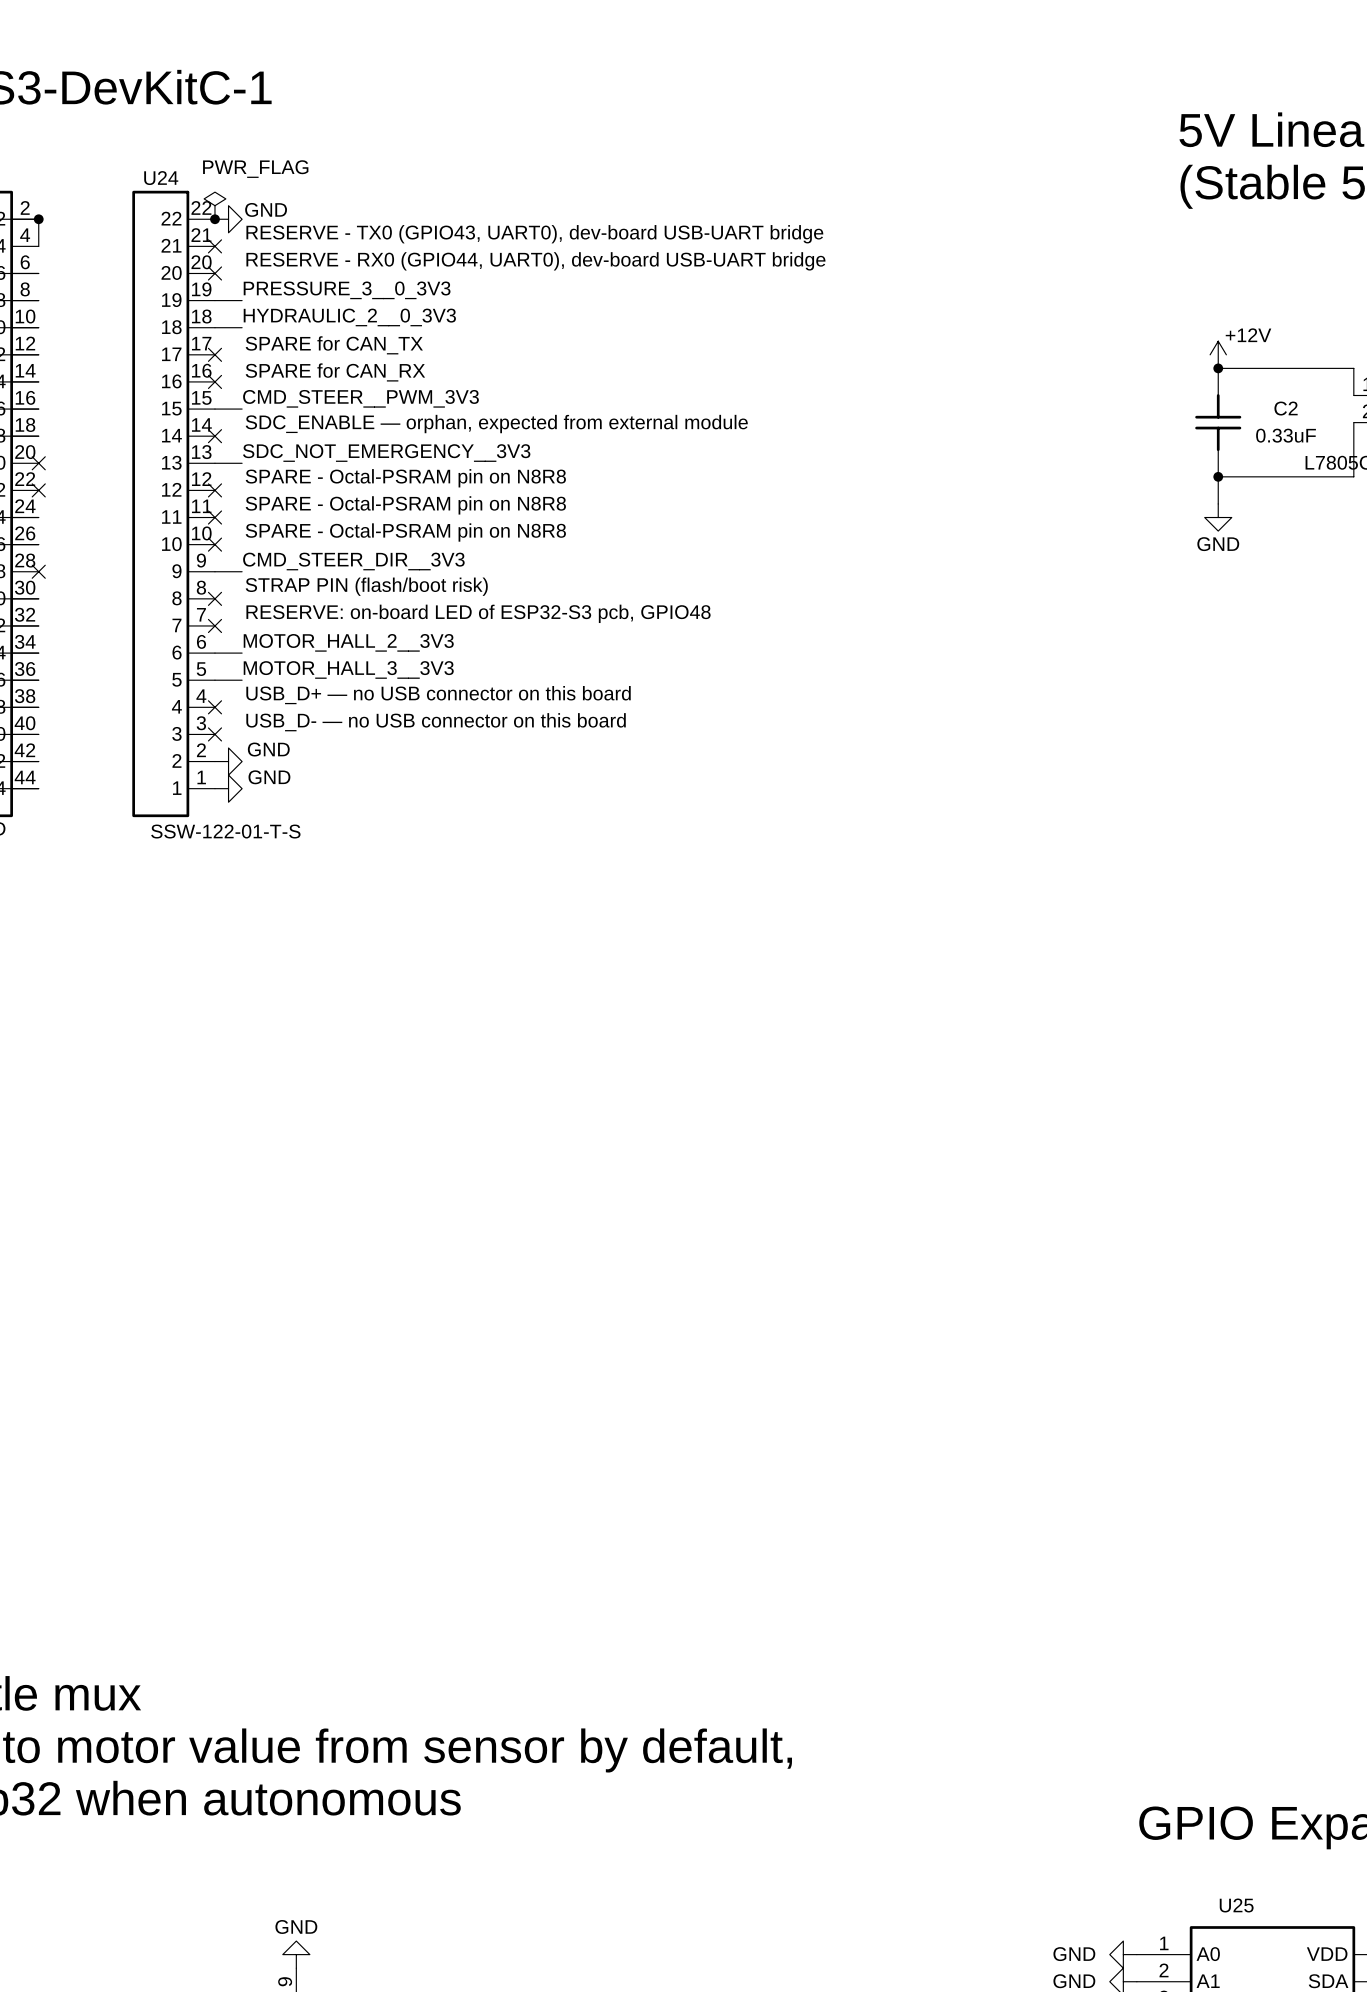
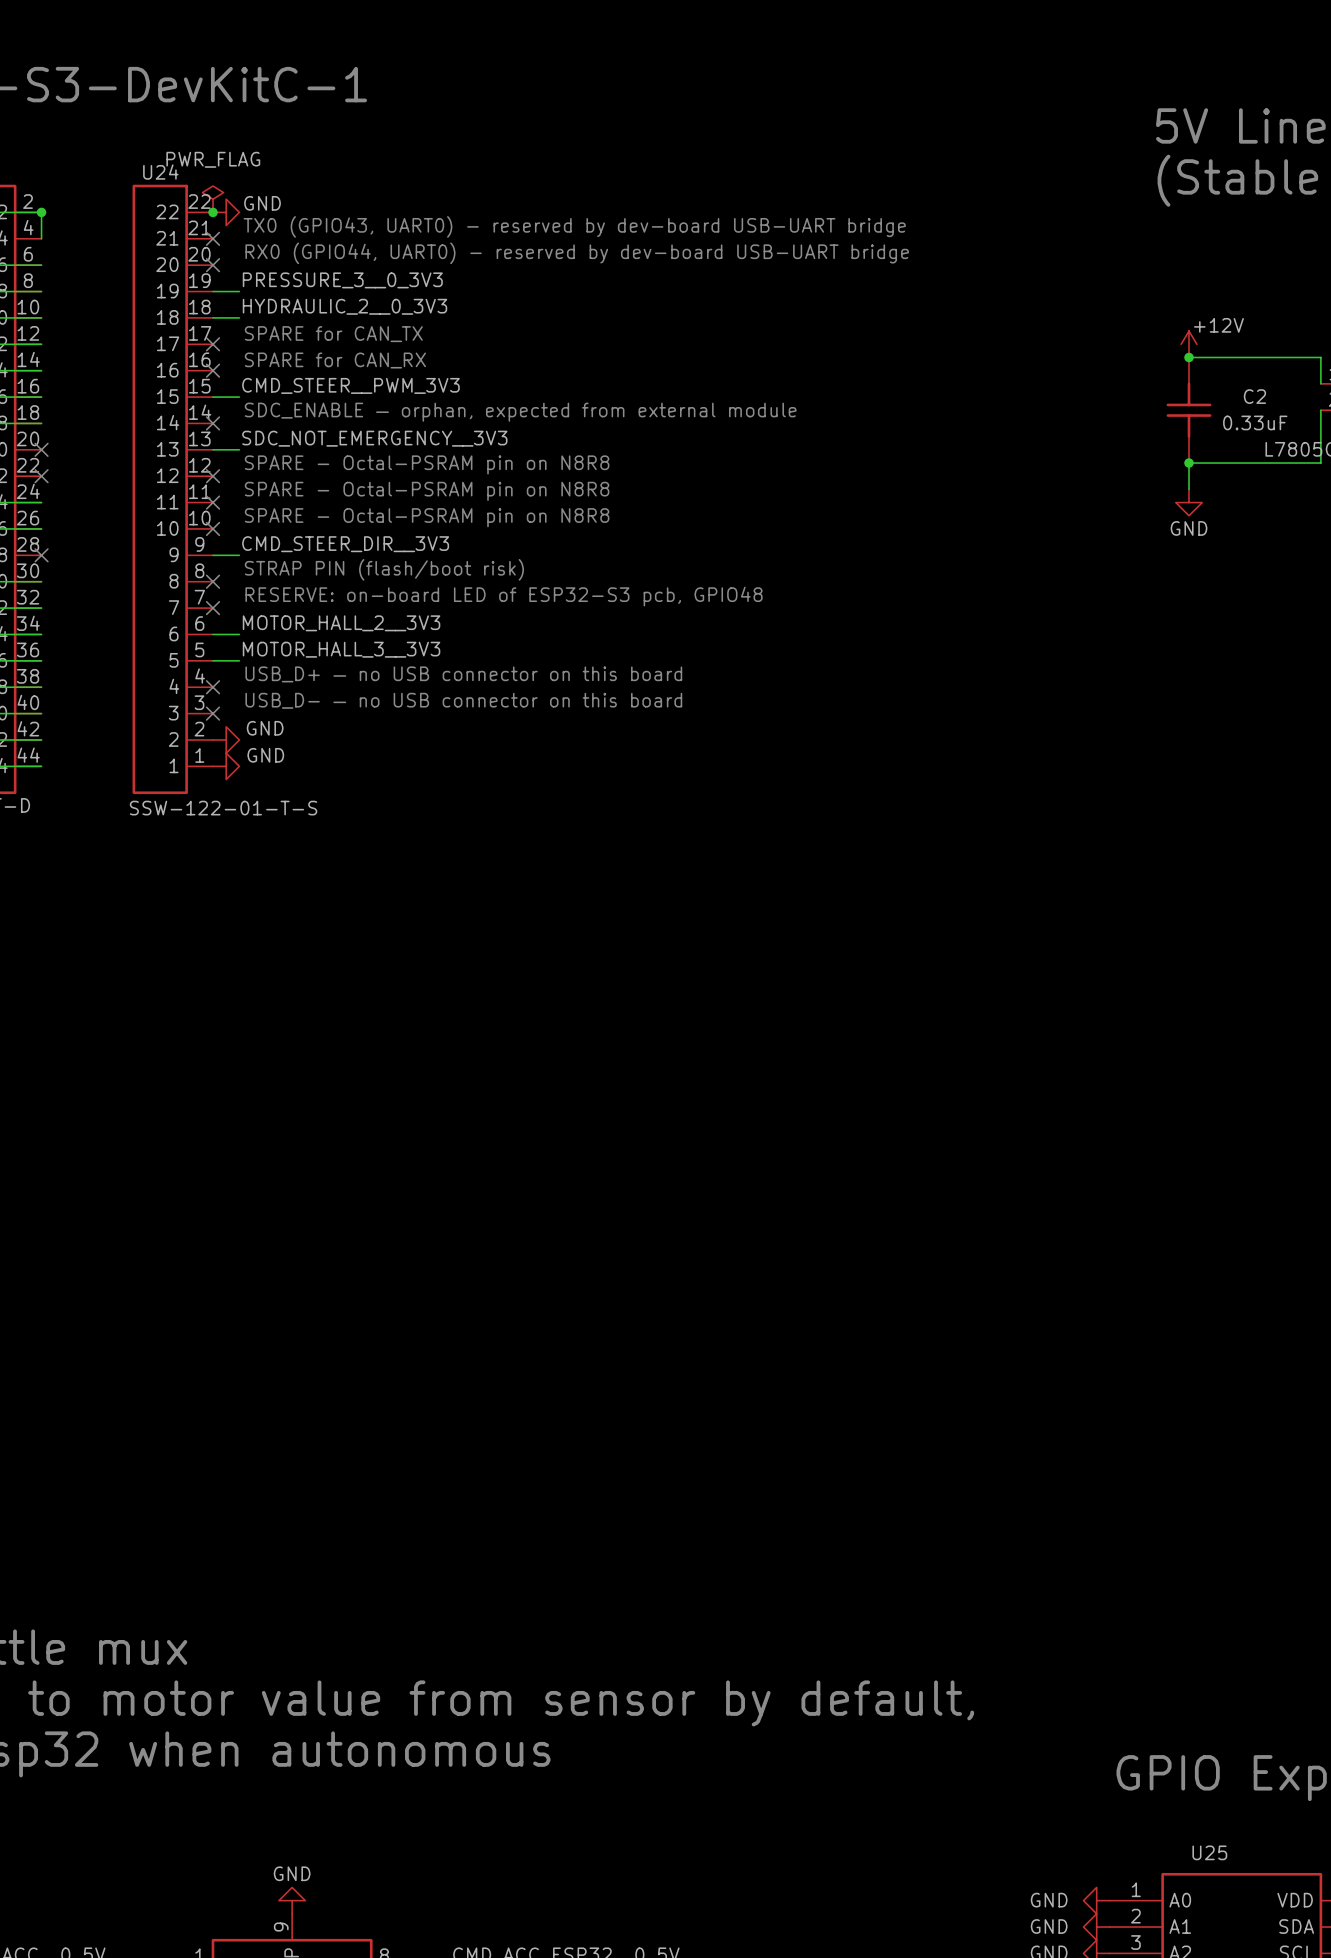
power symbol text position: PWR_FLAG (255, 169) -> PWR_FLAG (213, 159)
text: RESERVE - TX0 (GPIO43, UART0), dev-board USB-UART bridge (534, 234) -> TX0 (GPIO43, UART0) - reserved by dev-board USB-UART bridge (574, 226)
text: RESERVE - RX0 (GPIO44, UART0), dev-board USB-UART bridge (535, 261) -> RX0 (GPIO44, UART0) - reserved by dev-board USB-UART bridge (577, 253)

